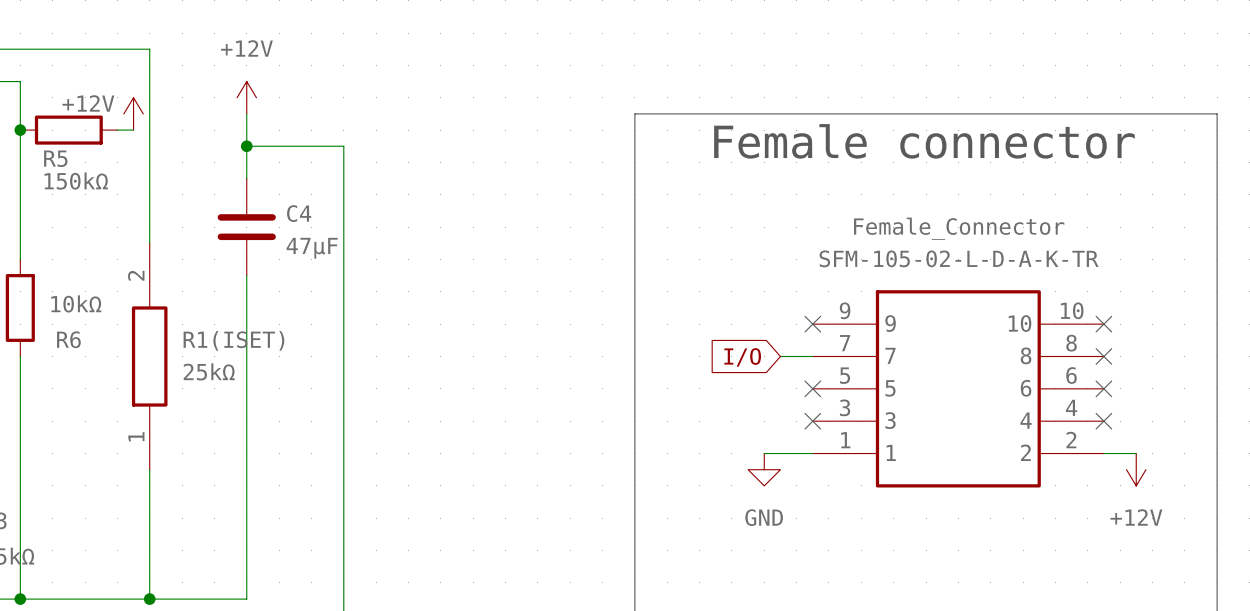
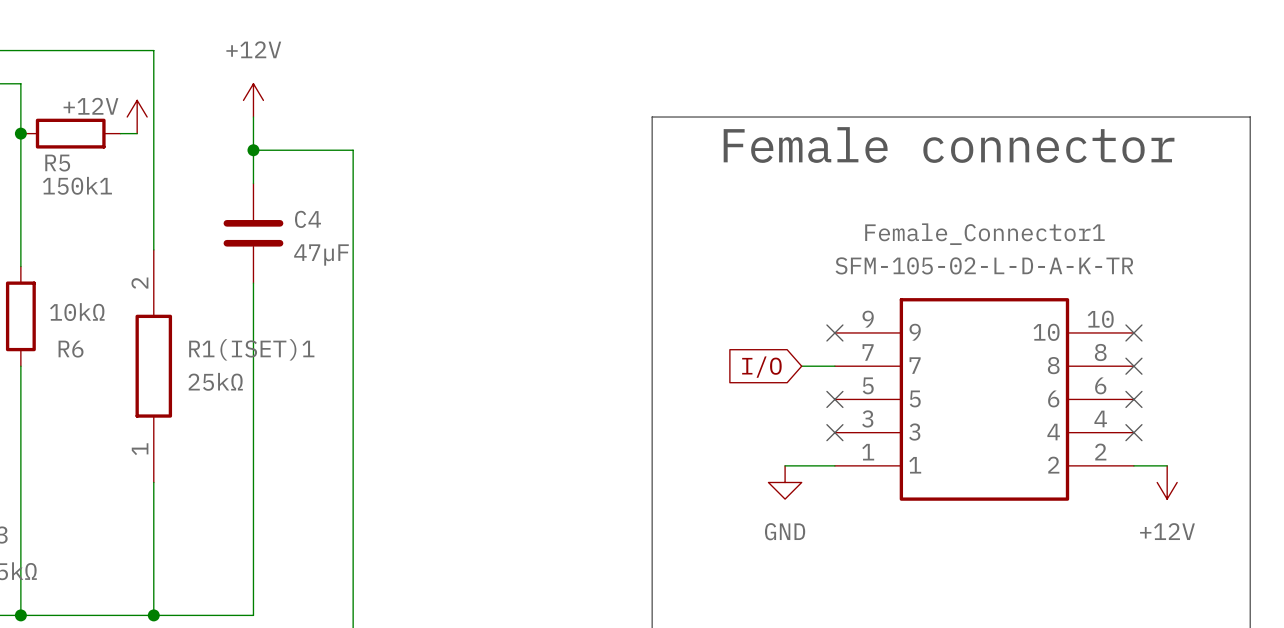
150kΩ name: 150kΩ (76, 181) -> 150k1 (77, 185)
Female_Connector name: Female_Connector (959, 228) -> Female_Connector1 (984, 234)
R1(ISET) name: R1(ISET) (233, 340) -> R1(ISET)1 (251, 349)

